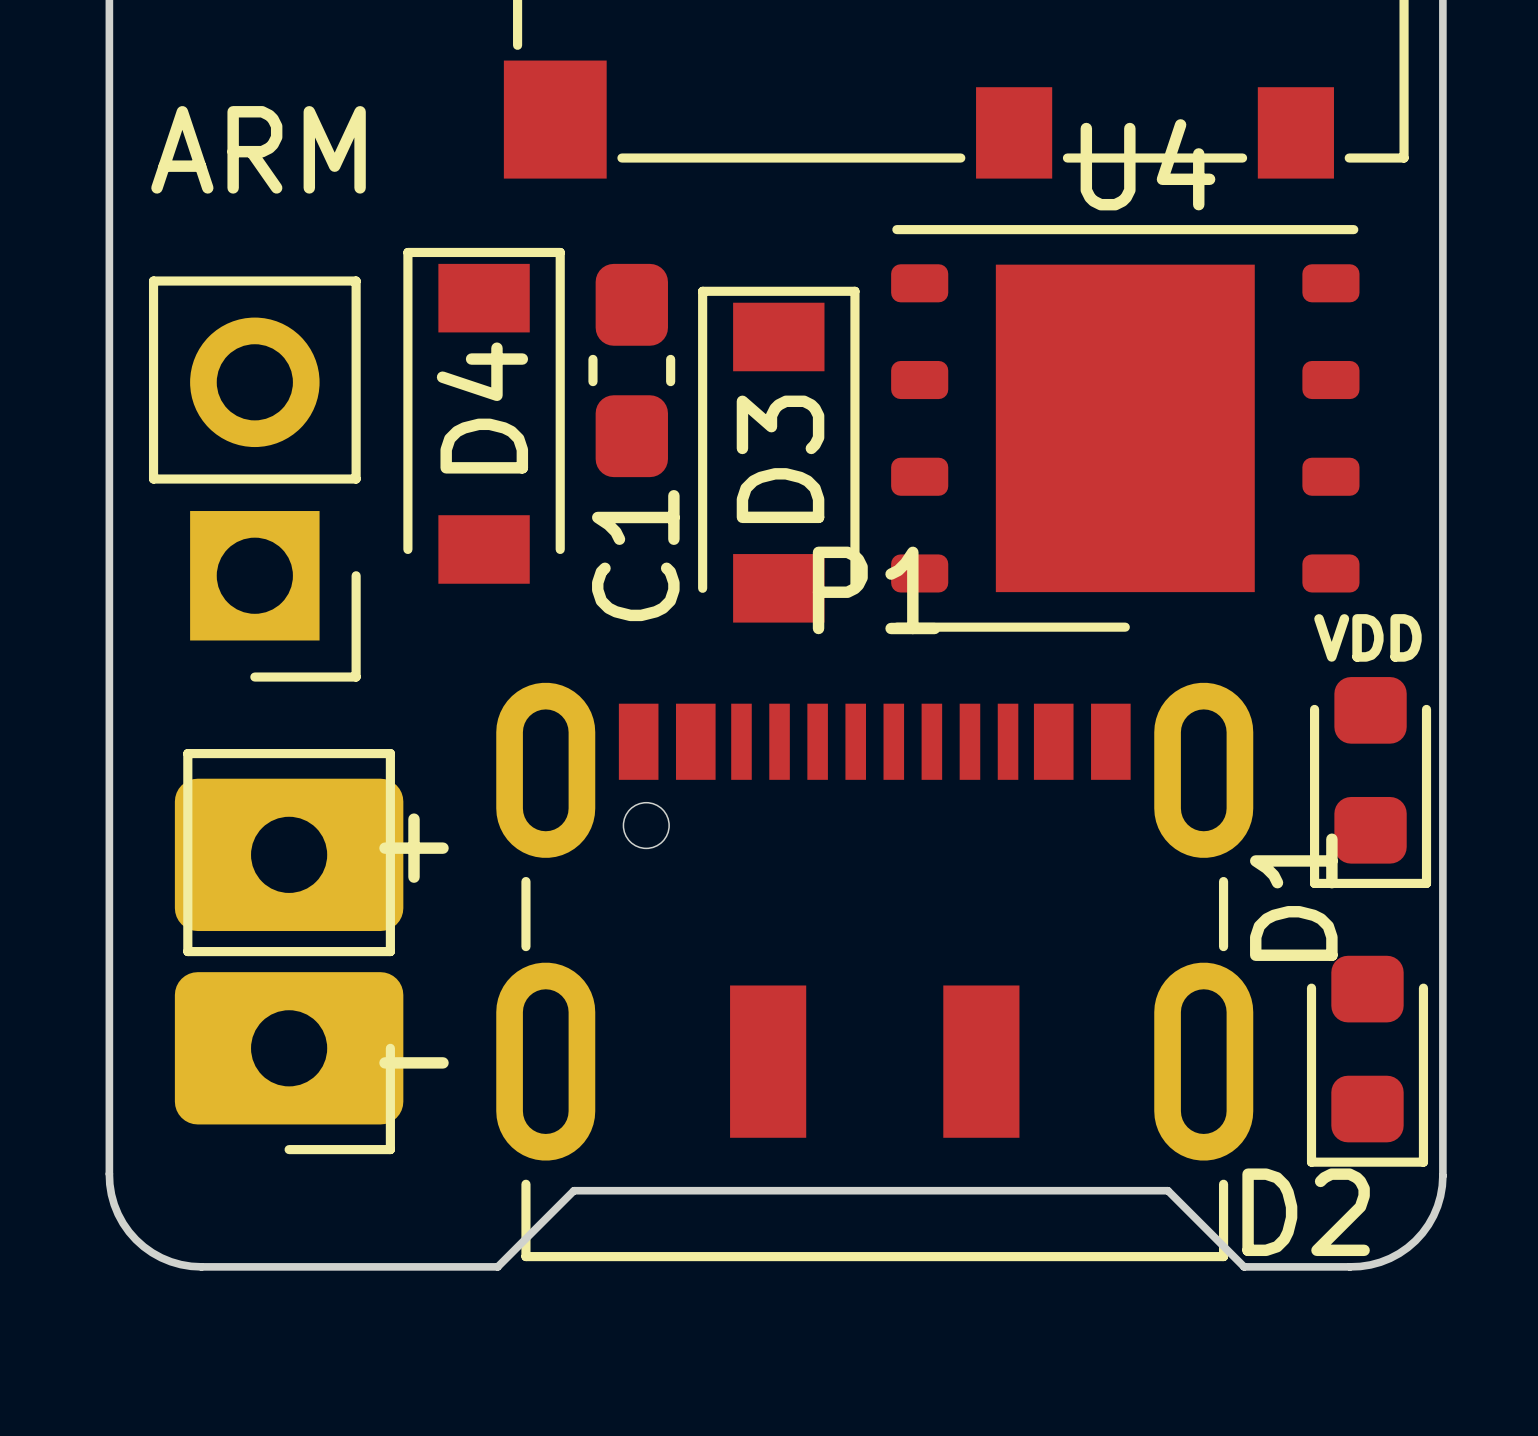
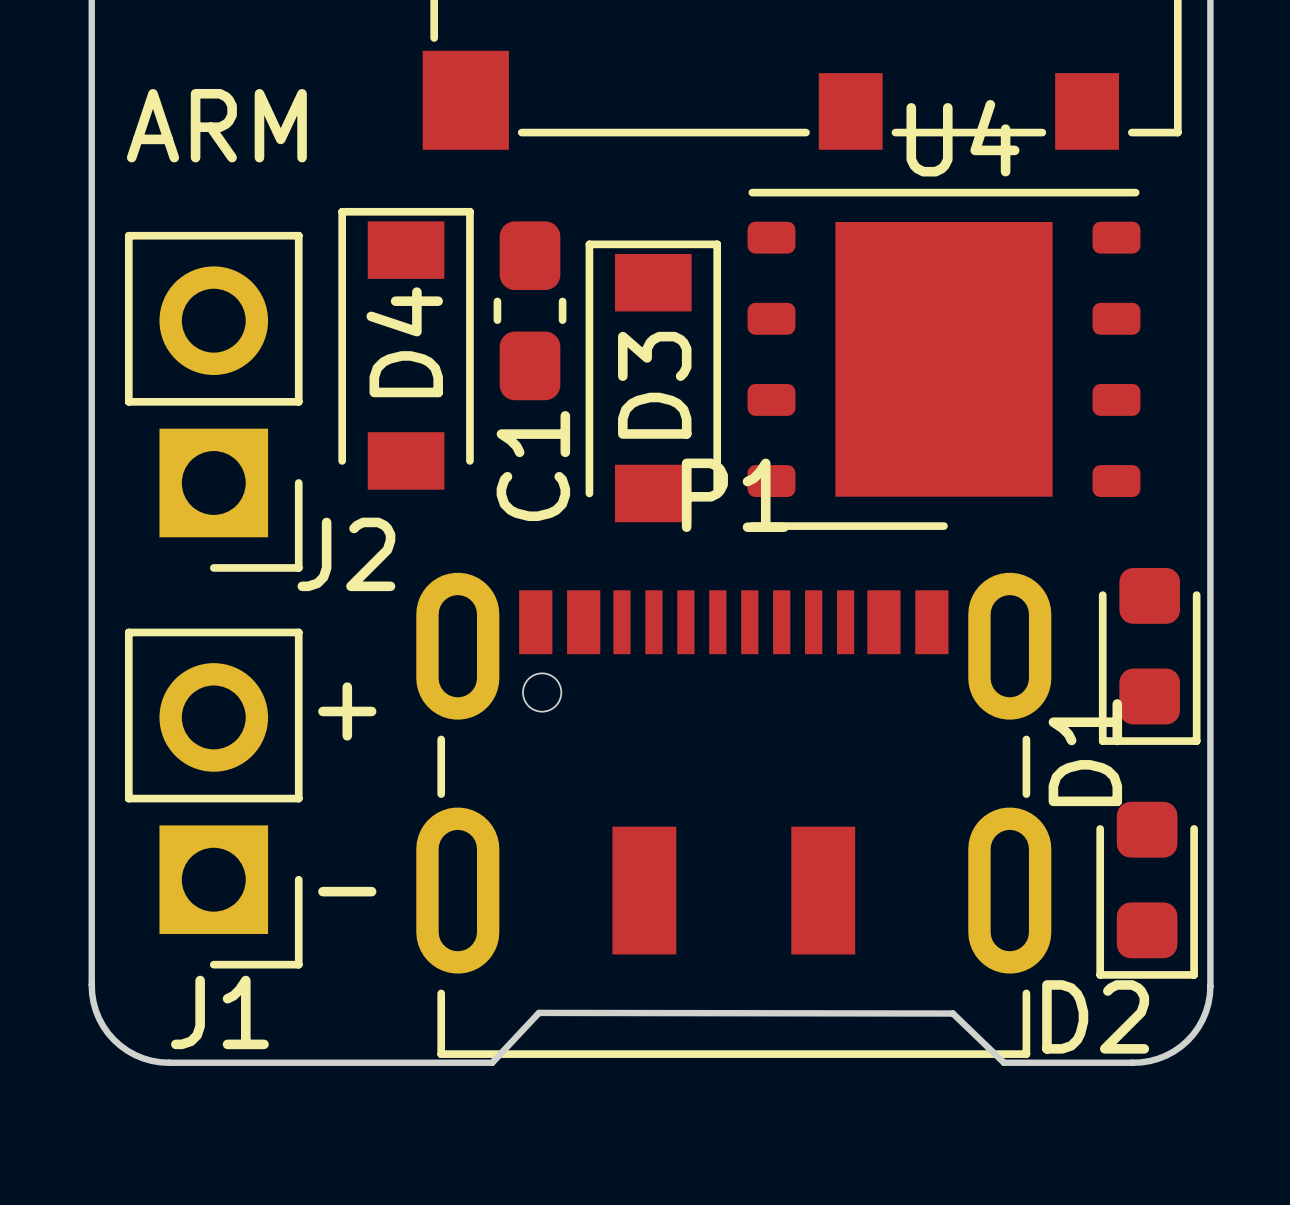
text: VDD (1367, 637) -> none
J2 name: none -> J2 (346, 554)
J1: none -> (213, 798)
part: (289, 951) -> none
board edge: (497, 1266) (573, 1190) (1167, 1190) (1244, 1266) -> (417, 1062) (492, 1062) (538, 1012) (952, 1013) (1004, 1062) (1043, 1062)

